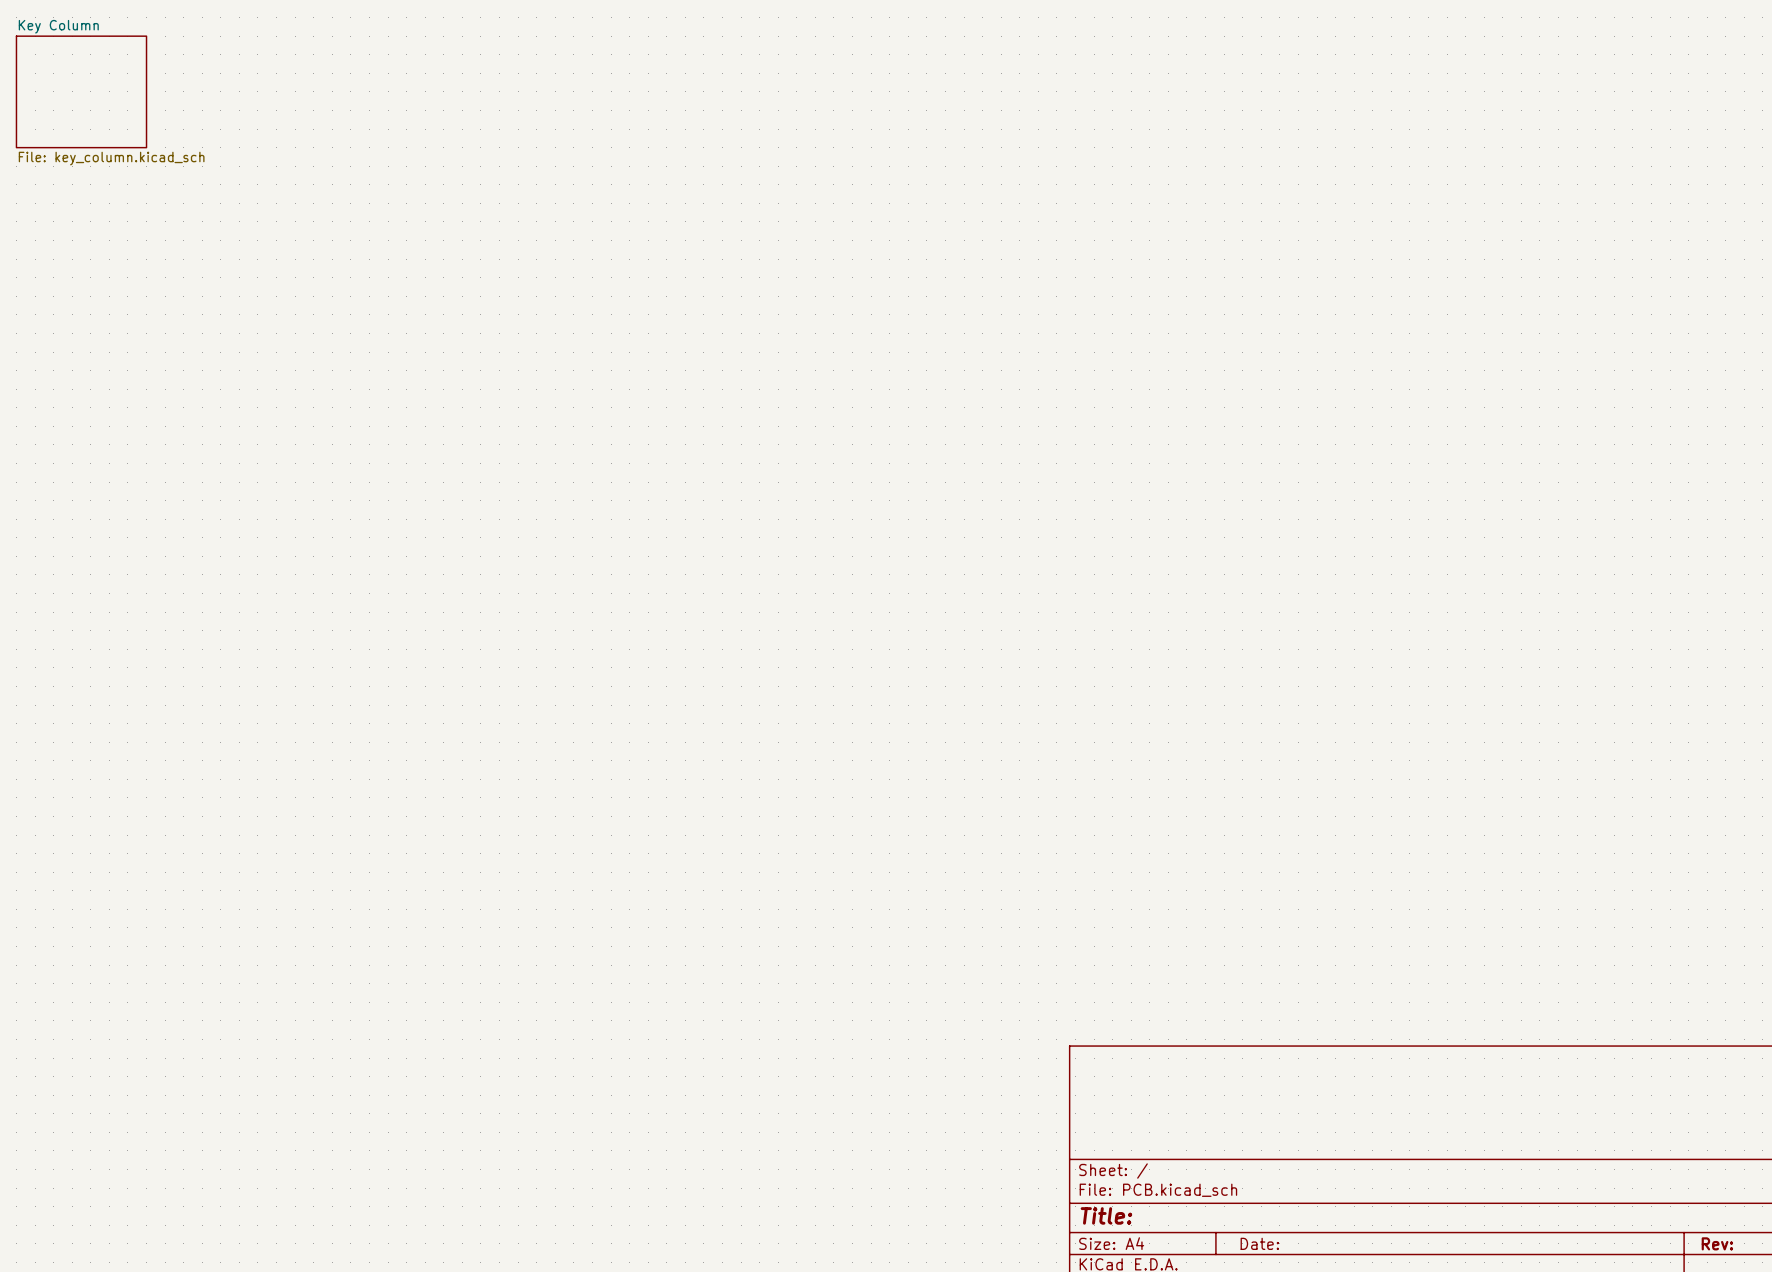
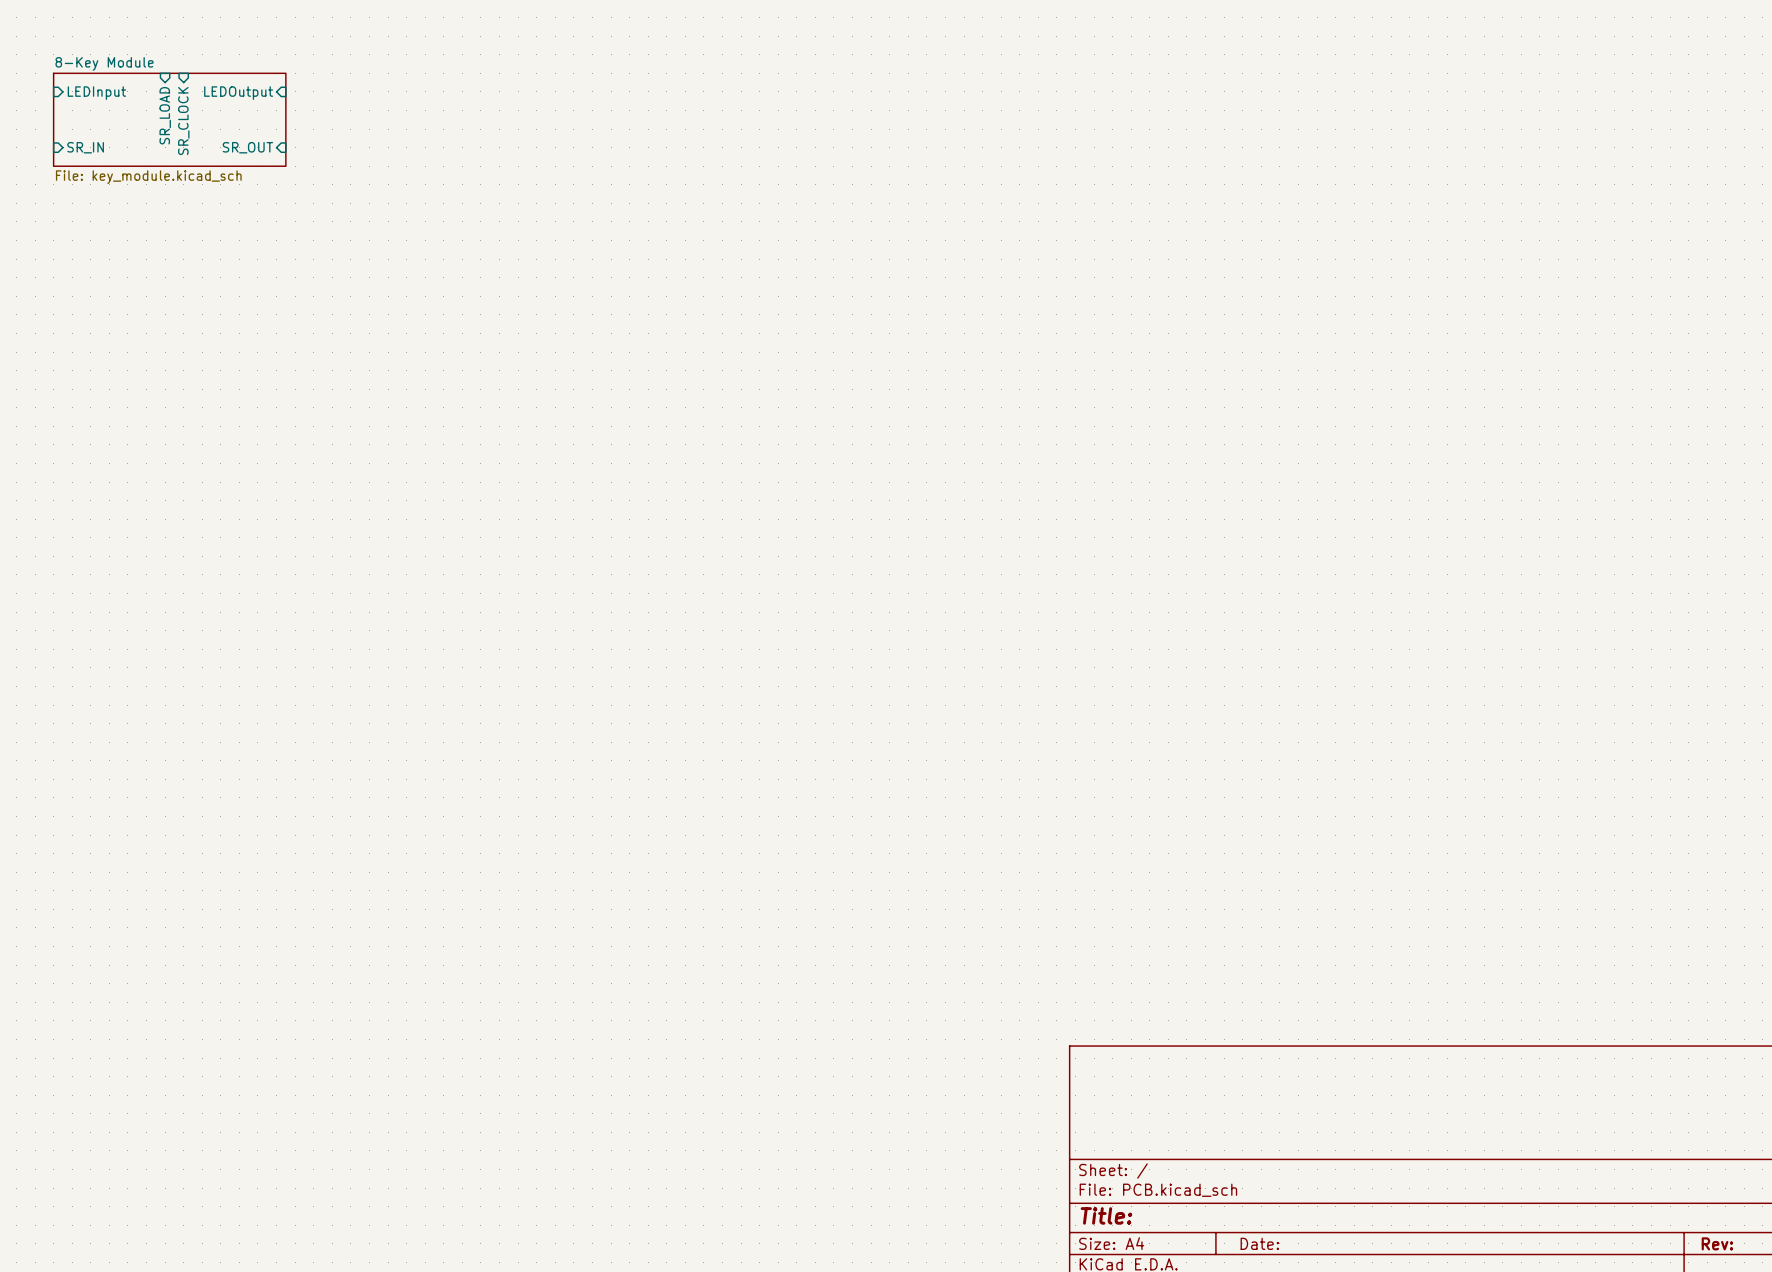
sheet Key Column: File: key_column.kicad_sch (81, 91) -> none
sheet pin: none -> LEDInput (96, 93)
sheet pin: none -> LEDOutput (238, 93)
sheet pin: none -> SR_LOAD (165, 115)
sheet 8-Key Module: none -> File: key_module.kicad_sch (169, 119)
sheet pin: none -> SR_CLOCK (183, 121)
sheet pin: none -> SR_IN (85, 147)
sheet pin: none -> SR_OUT (247, 147)

